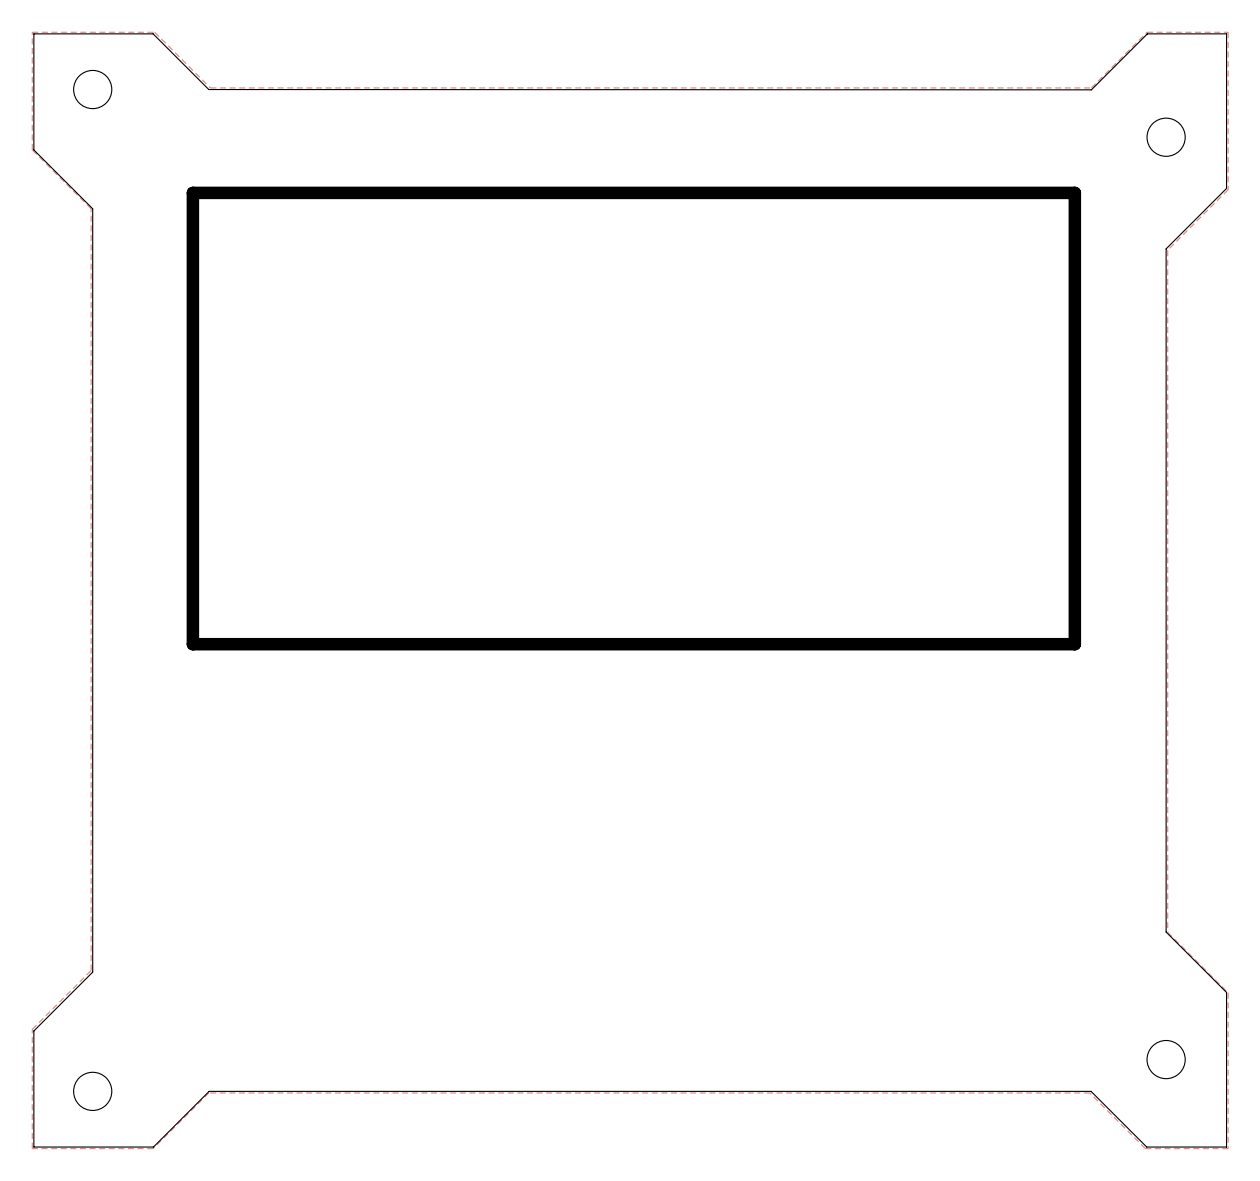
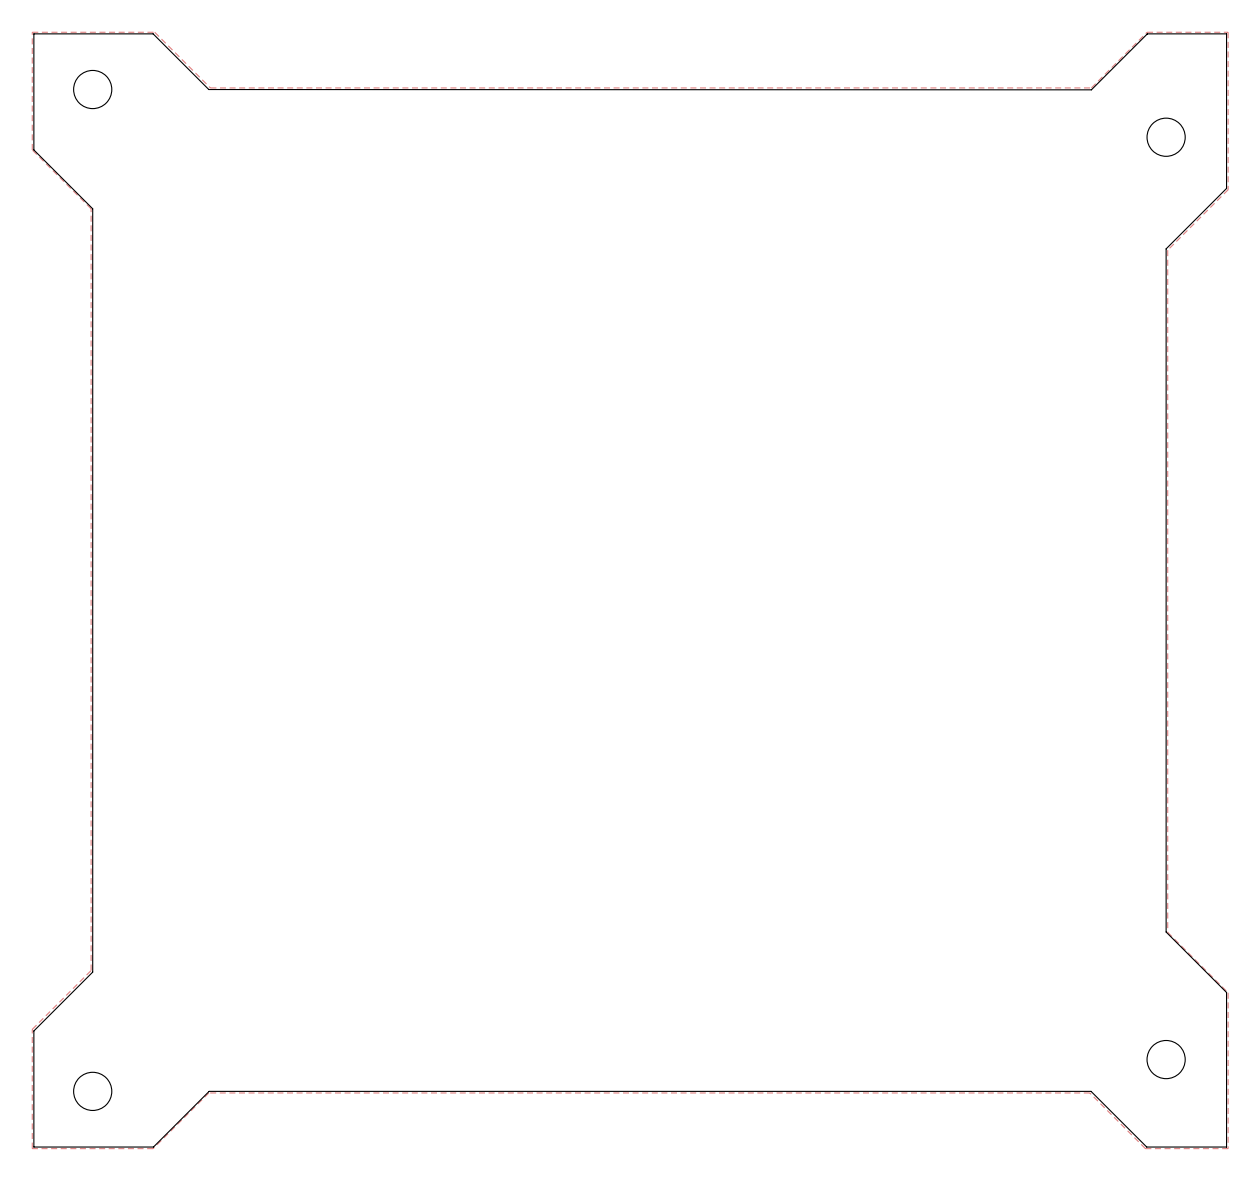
line: (192, 192) (1074, 192) (1074, 644) (192, 644) (192, 192) -> none

